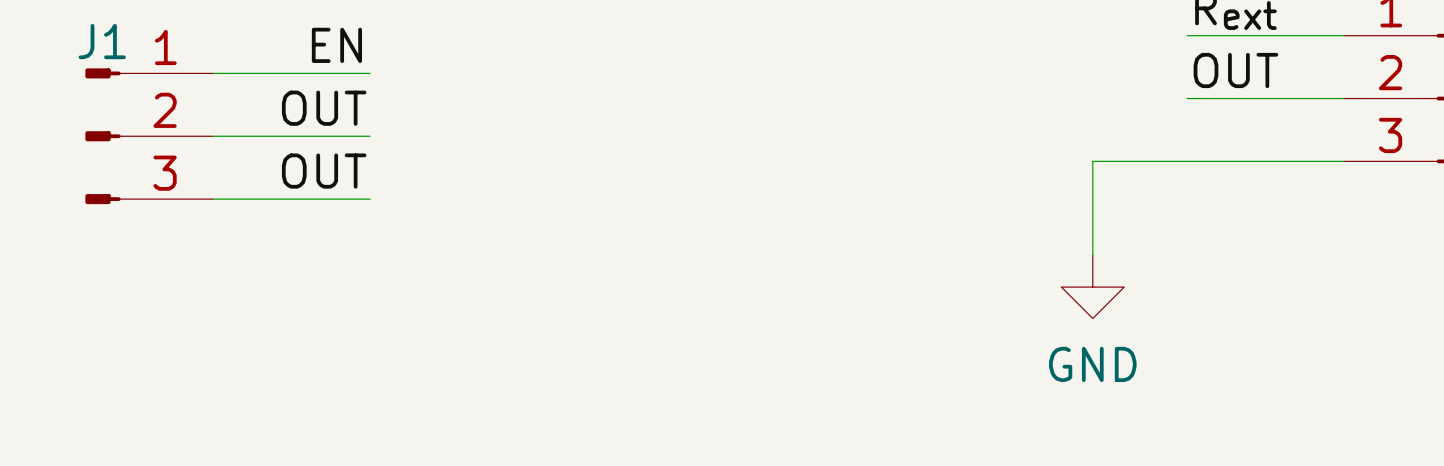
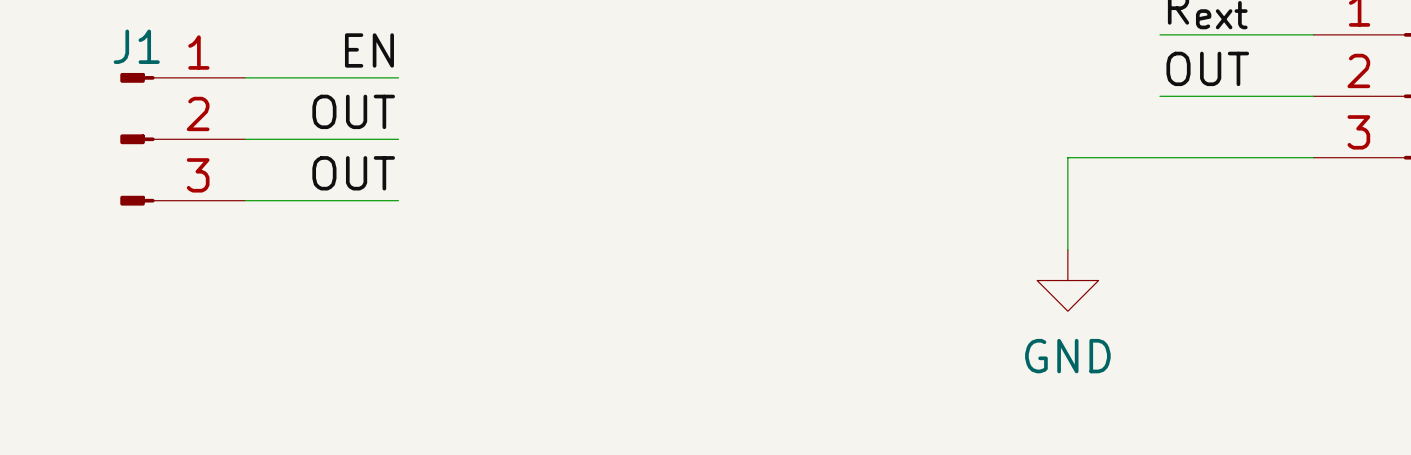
label position: EN (336, 45) -> EN (369, 50)
wire: (212, 73) (370, 73) -> (244, 77) (398, 77)
label: OUT (324, 108) -> none
label: none -> OUT (353, 111)
J1 position: (149, 136) -> (182, 139)
wire: (212, 136) (370, 136) -> (244, 139) (398, 139)
label: OUT (324, 171) -> none
label: none -> OUT (353, 173)
wire: (212, 199) (370, 199) -> (244, 200) (398, 200)

